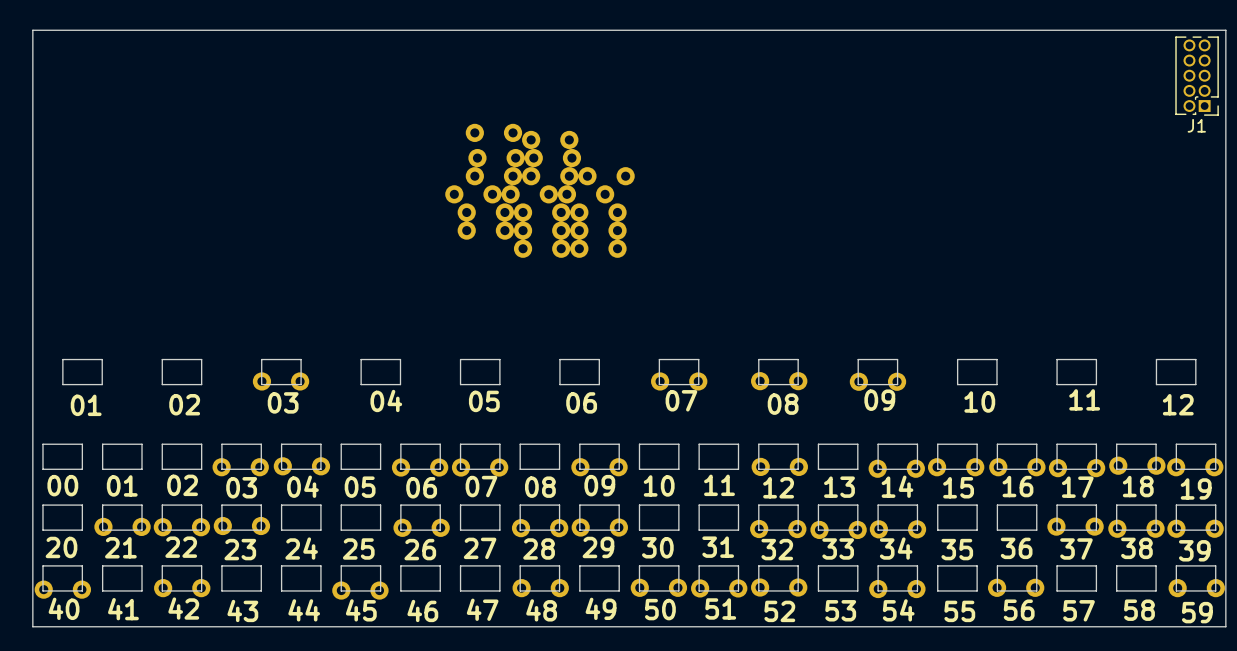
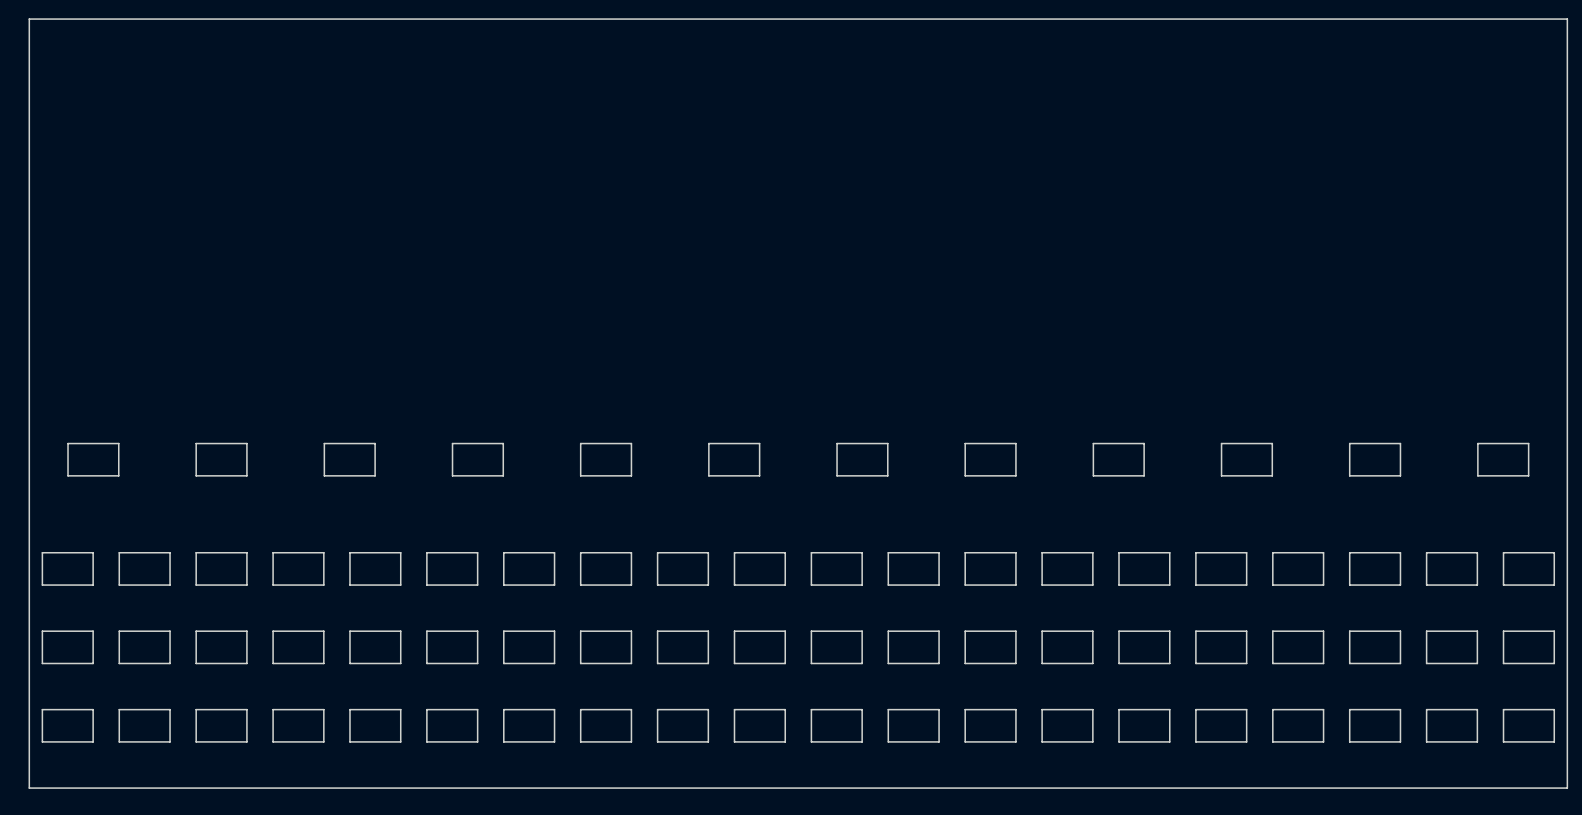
J1: (1197, 76) -> none
part: (493, 132) -> none
part: (550, 139) -> none
part: (496, 158) -> none
part: (552, 158) -> none
part: (493, 176) -> none
part: (550, 176) -> none
part: (606, 176) -> none
part: (473, 194) -> none
part: (529, 194) -> none
part: (586, 194) -> none
part: (485, 212) -> none
part: (542, 212) -> none
part: (598, 212) -> none
part: (485, 230) -> none
part: (542, 230) -> none
part: (598, 230) -> none
part: (542, 248) -> none
part: (598, 248) -> none
part: (281, 381) -> none
part: (679, 381) -> none
part: (779, 381) -> none
part: (877, 381) -> none
text: 11 (1084, 399) -> none
text: 04 (386, 400) -> none
text: 07 (681, 400) -> none
text: 09 (879, 400) -> none
text: 05 (484, 401) -> none
text: 03 (283, 402) -> none
text: 06 (581, 402) -> none
text: 10 (979, 402) -> none
text: 02 (184, 404) -> none
text: 08 (783, 404) -> none
text: 12 (1178, 404) -> none
text: 01 (86, 405) -> none
part: (1137, 465) -> none
part: (301, 466) -> none
part: (779, 466) -> none
part: (240, 467) -> none
part: (420, 467) -> none
part: (480, 467) -> none
part: (599, 467) -> none
part: (956, 467) -> none
part: (1017, 467) -> none
part: (1195, 467) -> none
part: (896, 468) -> none
part: (1077, 468) -> none
text: 00 (62, 485) -> none
text: 01 (122, 485) -> none
text: 02 (182, 485) -> none
text: 09 (599, 485) -> none
text: 10 (659, 485) -> none
text: 11 (719, 485) -> none
text: 04 (302, 486) -> none
text: 07 (481, 486) -> none
text: 14 (897, 486) -> none
text: 16 (1017, 486) -> none
text: 18 (1138, 486) -> none
text: 03 (241, 487) -> none
text: 05 (360, 487) -> none
text: 06 (421, 487) -> none
text: 08 (540, 487) -> none
text: 12 (778, 487) -> none
text: 13 (839, 487) -> none
text: 15 (958, 487) -> none
text: 17 (1077, 487) -> none
text: 19 (1196, 488) -> none
part: (122, 526) -> none
part: (241, 526) -> none
part: (1075, 526) -> none
part: (181, 527) -> none
part: (421, 527) -> none
part: (599, 527) -> none
part: (540, 528) -> none
part: (1136, 528) -> none
part: (1195, 528) -> none
part: (778, 529) -> none
part: (838, 529) -> none
part: (897, 529) -> none
text: 20 (61, 547) -> none
text: 21 (120, 547) -> none
text: 22 (181, 547) -> none
text: 29 (598, 547) -> none
text: 30 (657, 547) -> none
text: 31 (718, 547) -> none
text: 24 (301, 548) -> none
text: 25 (358, 548) -> none
text: 27 (480, 548) -> none
text: 28 (539, 548) -> none
text: 33 (838, 548) -> none
text: 34 (896, 548) -> none
text: 36 (1016, 548) -> none
text: 37 (1076, 548) -> none
text: 38 (1136, 548) -> none
text: 23 (240, 549) -> none
text: 26 (420, 549) -> none
text: 32 (777, 549) -> none
text: 35 (957, 549) -> none
text: 39 (1194, 550) -> none
part: (658, 587) -> none
part: (779, 587) -> none
part: (1016, 587) -> none
part: (182, 588) -> none
part: (540, 588) -> none
part: (719, 588) -> none
part: (1196, 588) -> none
part: (62, 589) -> none
part: (897, 589) -> none
part: (360, 590) -> none
text: 40 (64, 608) -> none
text: 42 (183, 608) -> none
text: 49 (601, 608) -> none
text: 51 (720, 608) -> none
text: 41 (123, 609) -> none
text: 47 (482, 609) -> none
text: 50 (660, 609) -> none
text: 43 (242, 610) -> none
text: 44 (304, 610) -> none
text: 45 (361, 610) -> none
text: 46 (422, 610) -> none
text: 48 (541, 610) -> none
text: 53 (840, 610) -> none
text: 54 (898, 610) -> none
text: 56 (1019, 610) -> none
text: 57 (1079, 610) -> none
text: 58 (1139, 610) -> none
text: 52 (779, 611) -> none
text: 55 (959, 611) -> none
text: 59 (1197, 612) -> none

